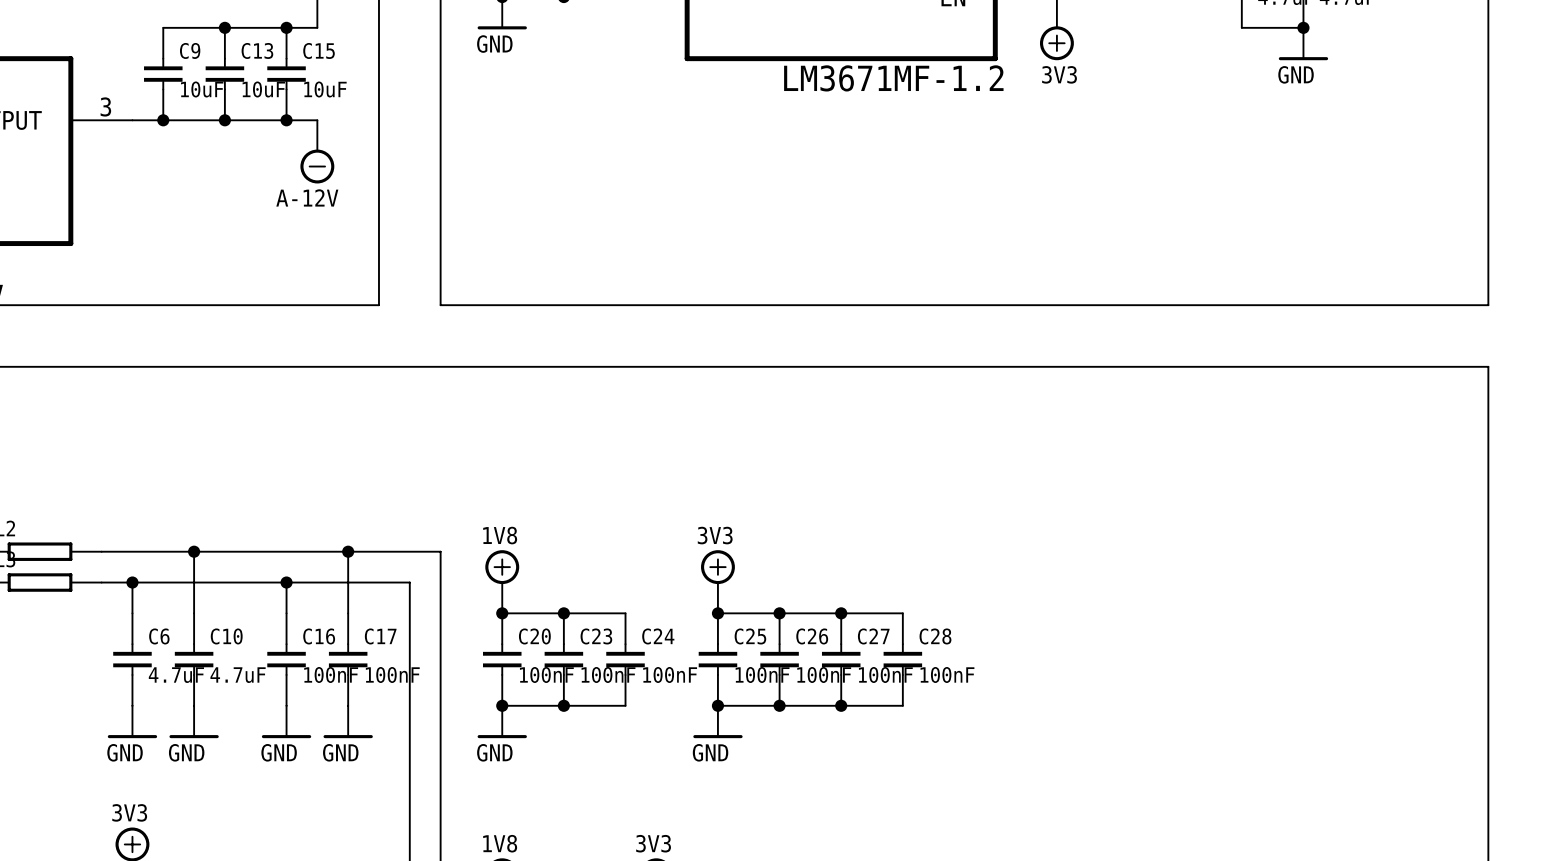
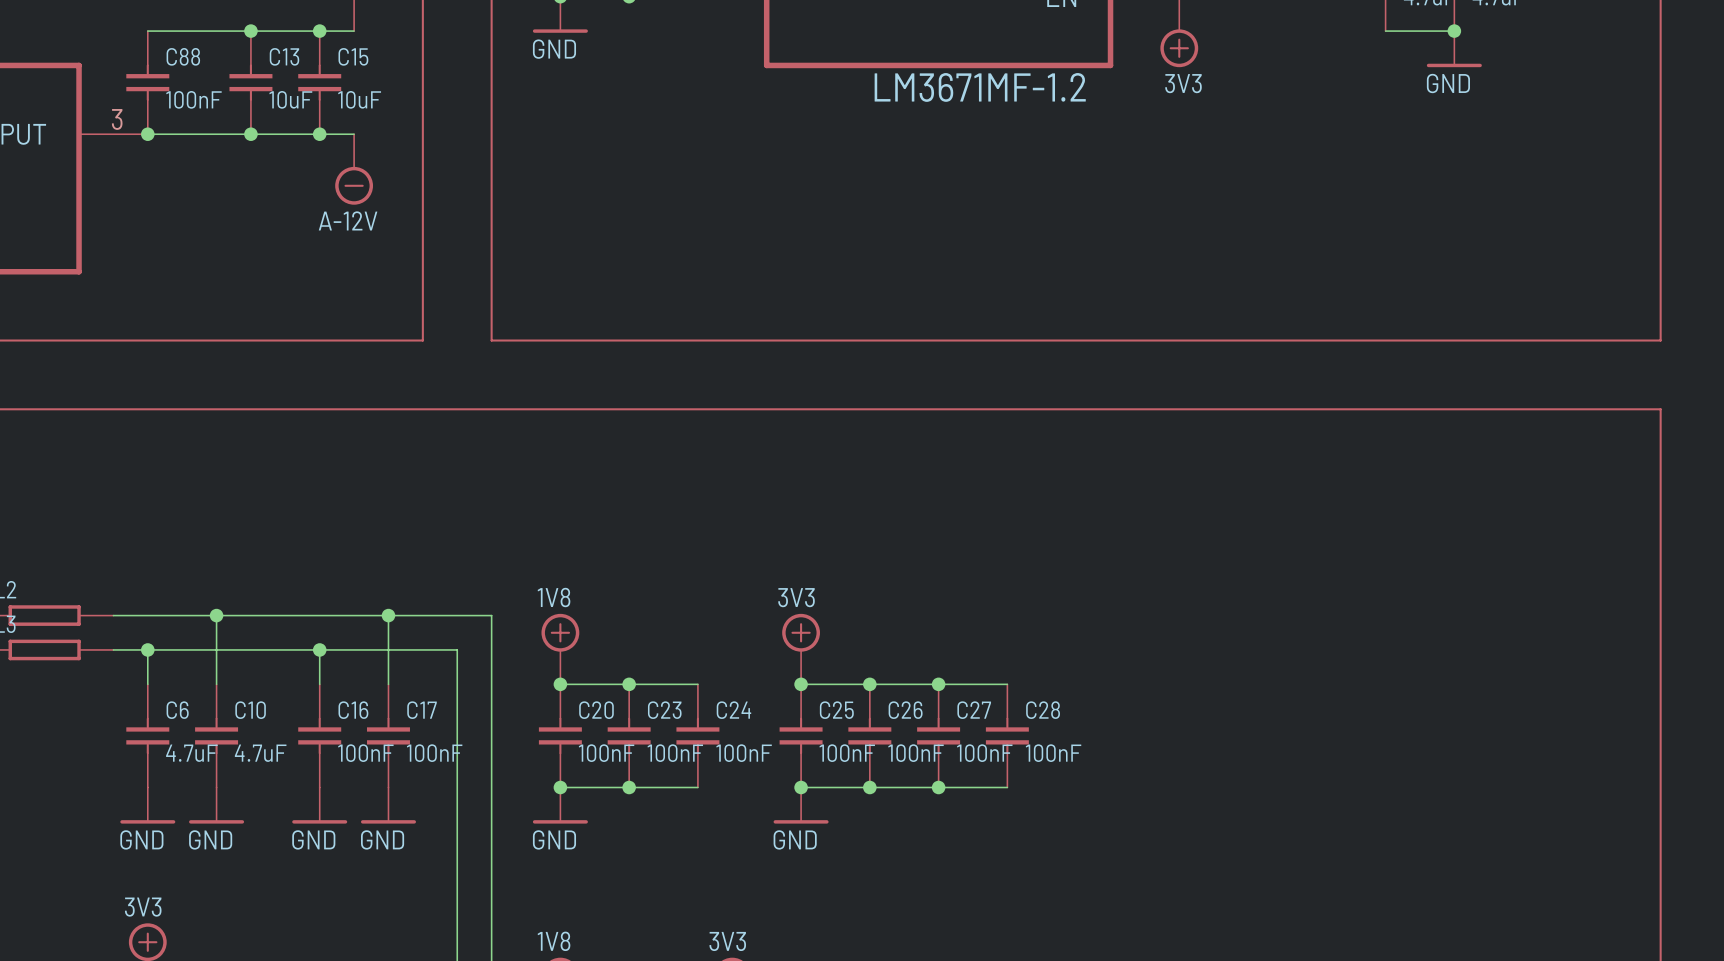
wire: none -> (147, 31) (182, 31)
C88: none -> 100nF (147, 82)
C9: 10uF (163, 74) -> none
junction position: (163, 120) -> (147, 134)

